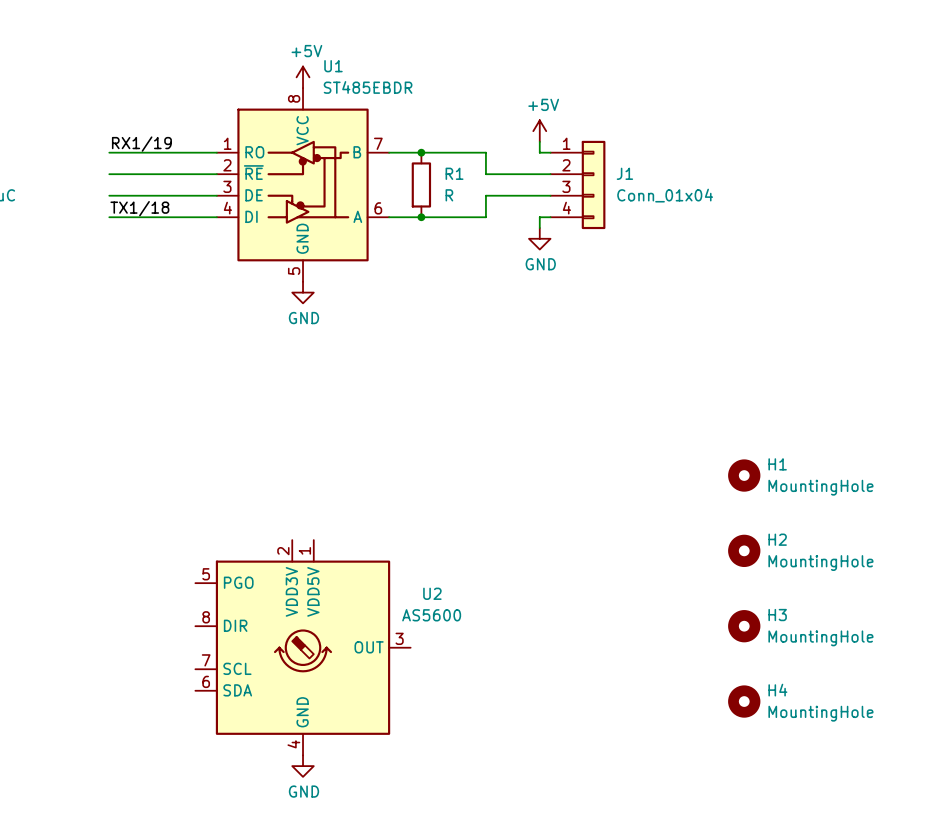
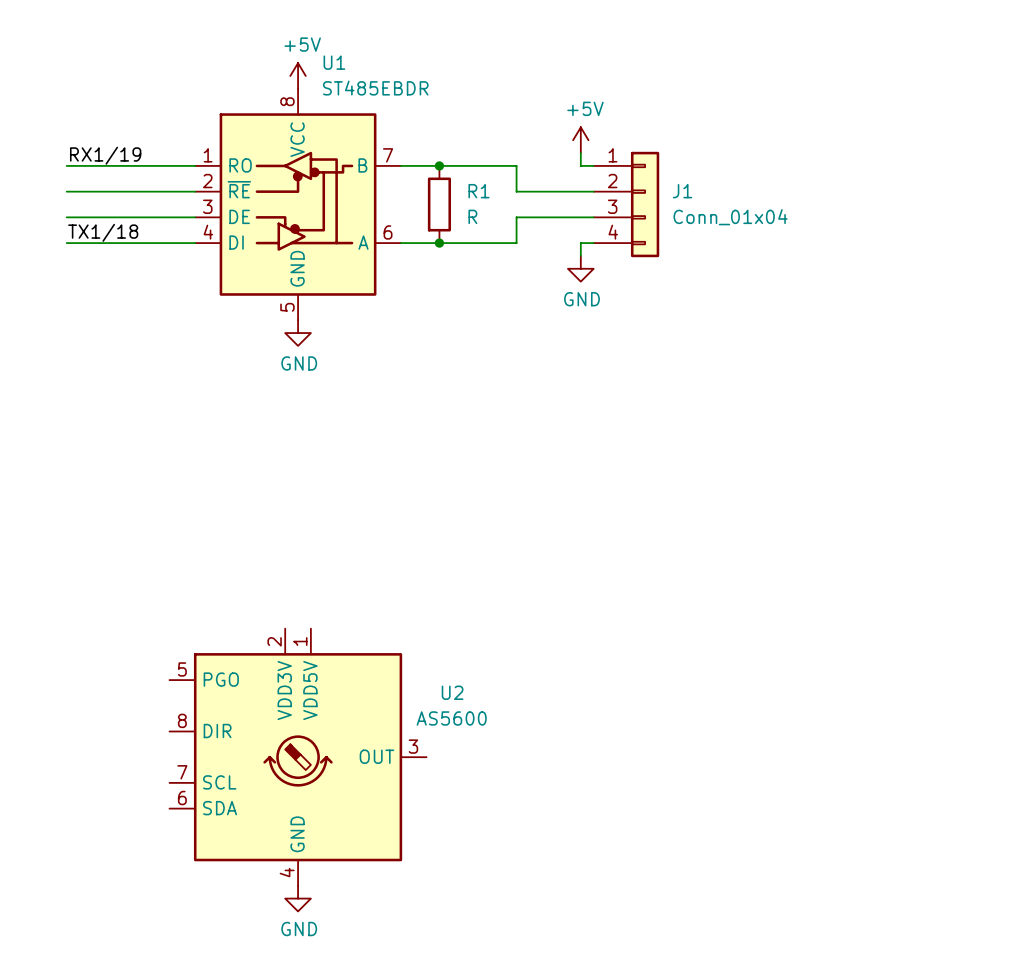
H1: MountingHole (744, 475) -> none
H2: MountingHole (744, 550) -> none
H3: MountingHole (744, 626) -> none
H4: MountingHole (744, 701) -> none

